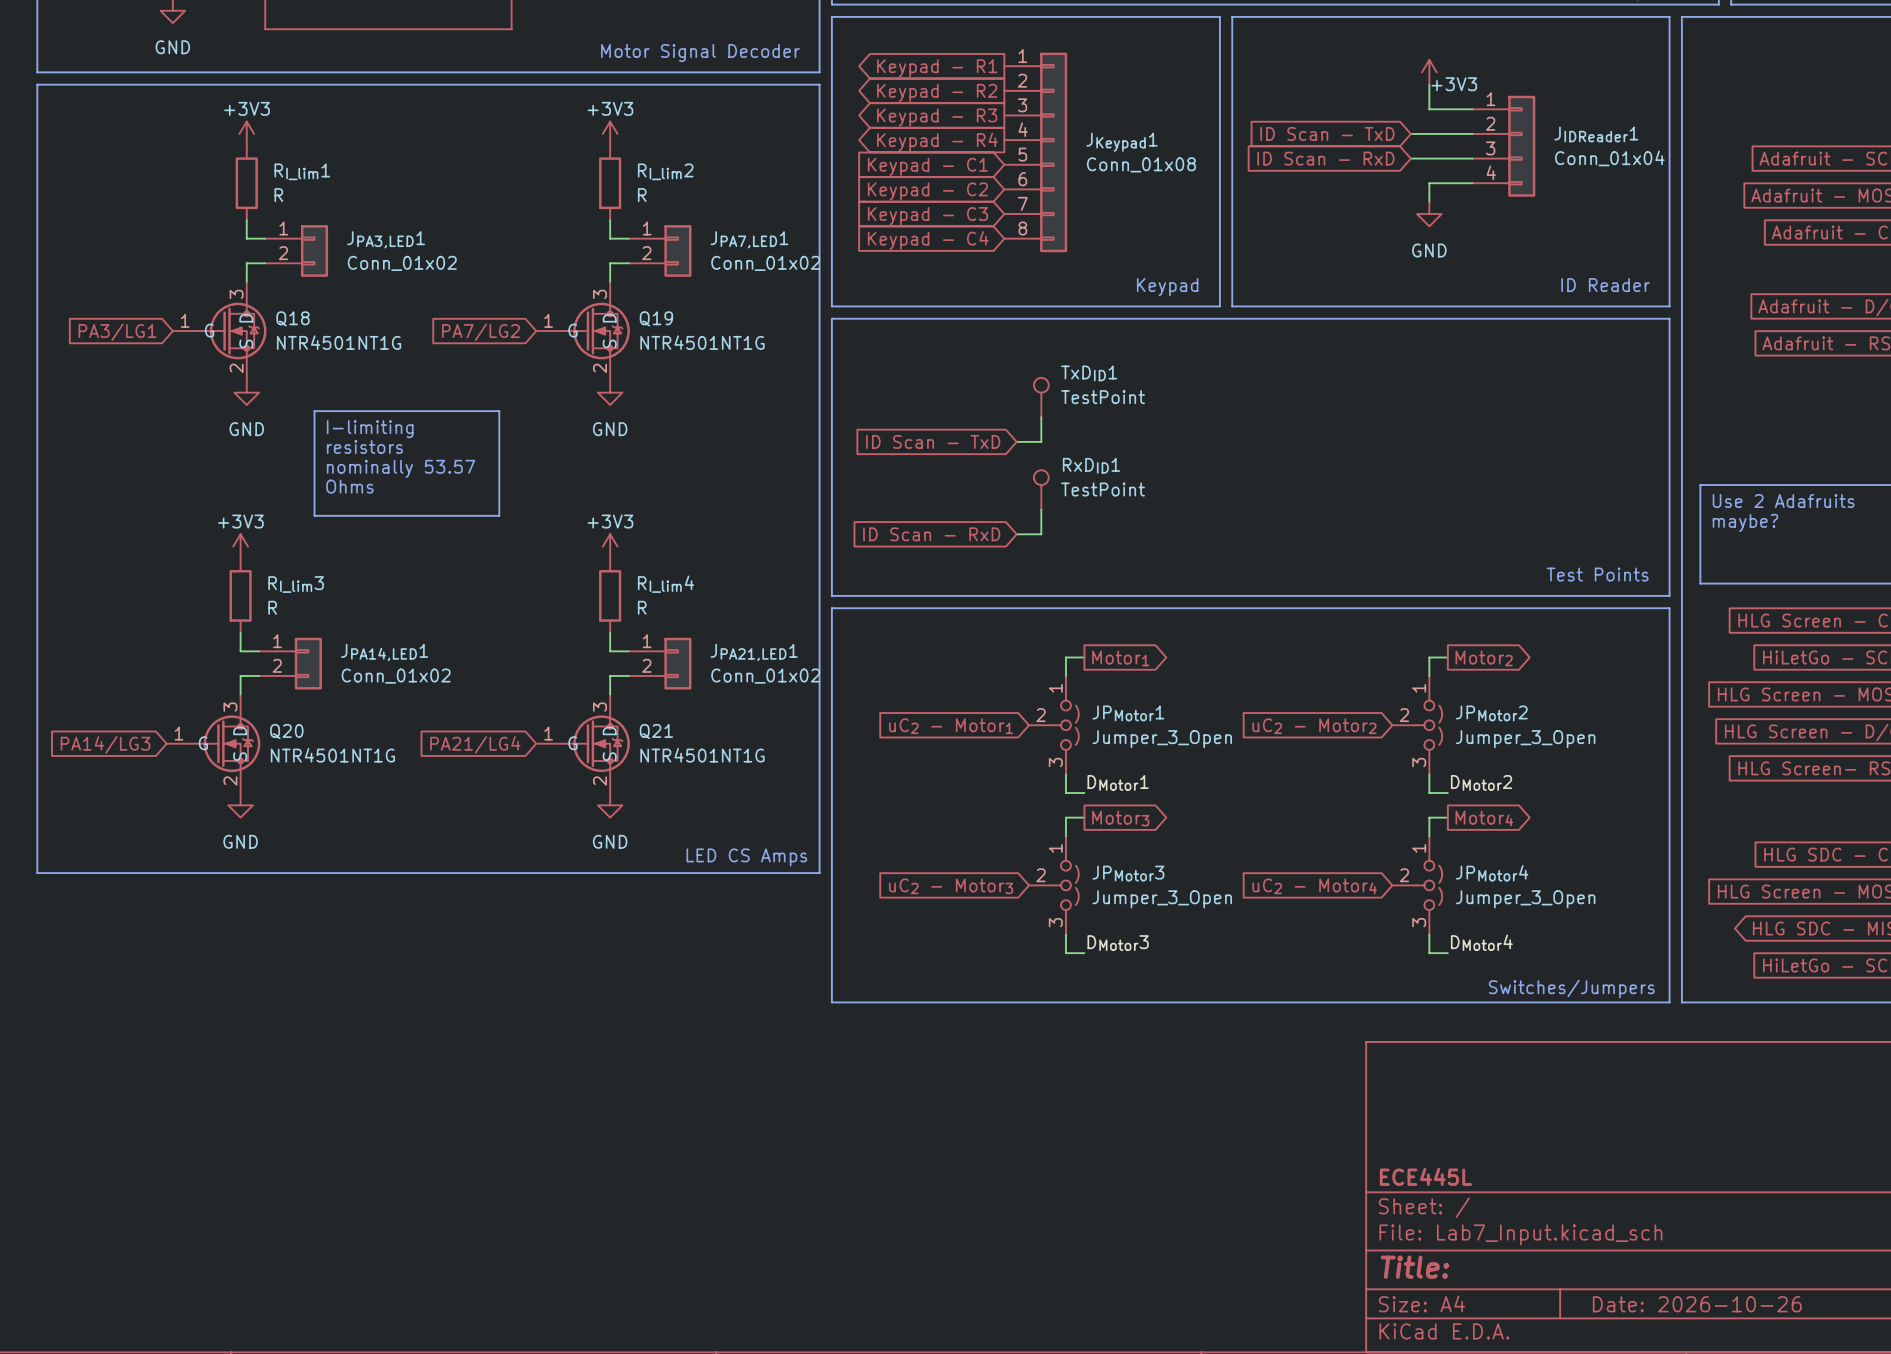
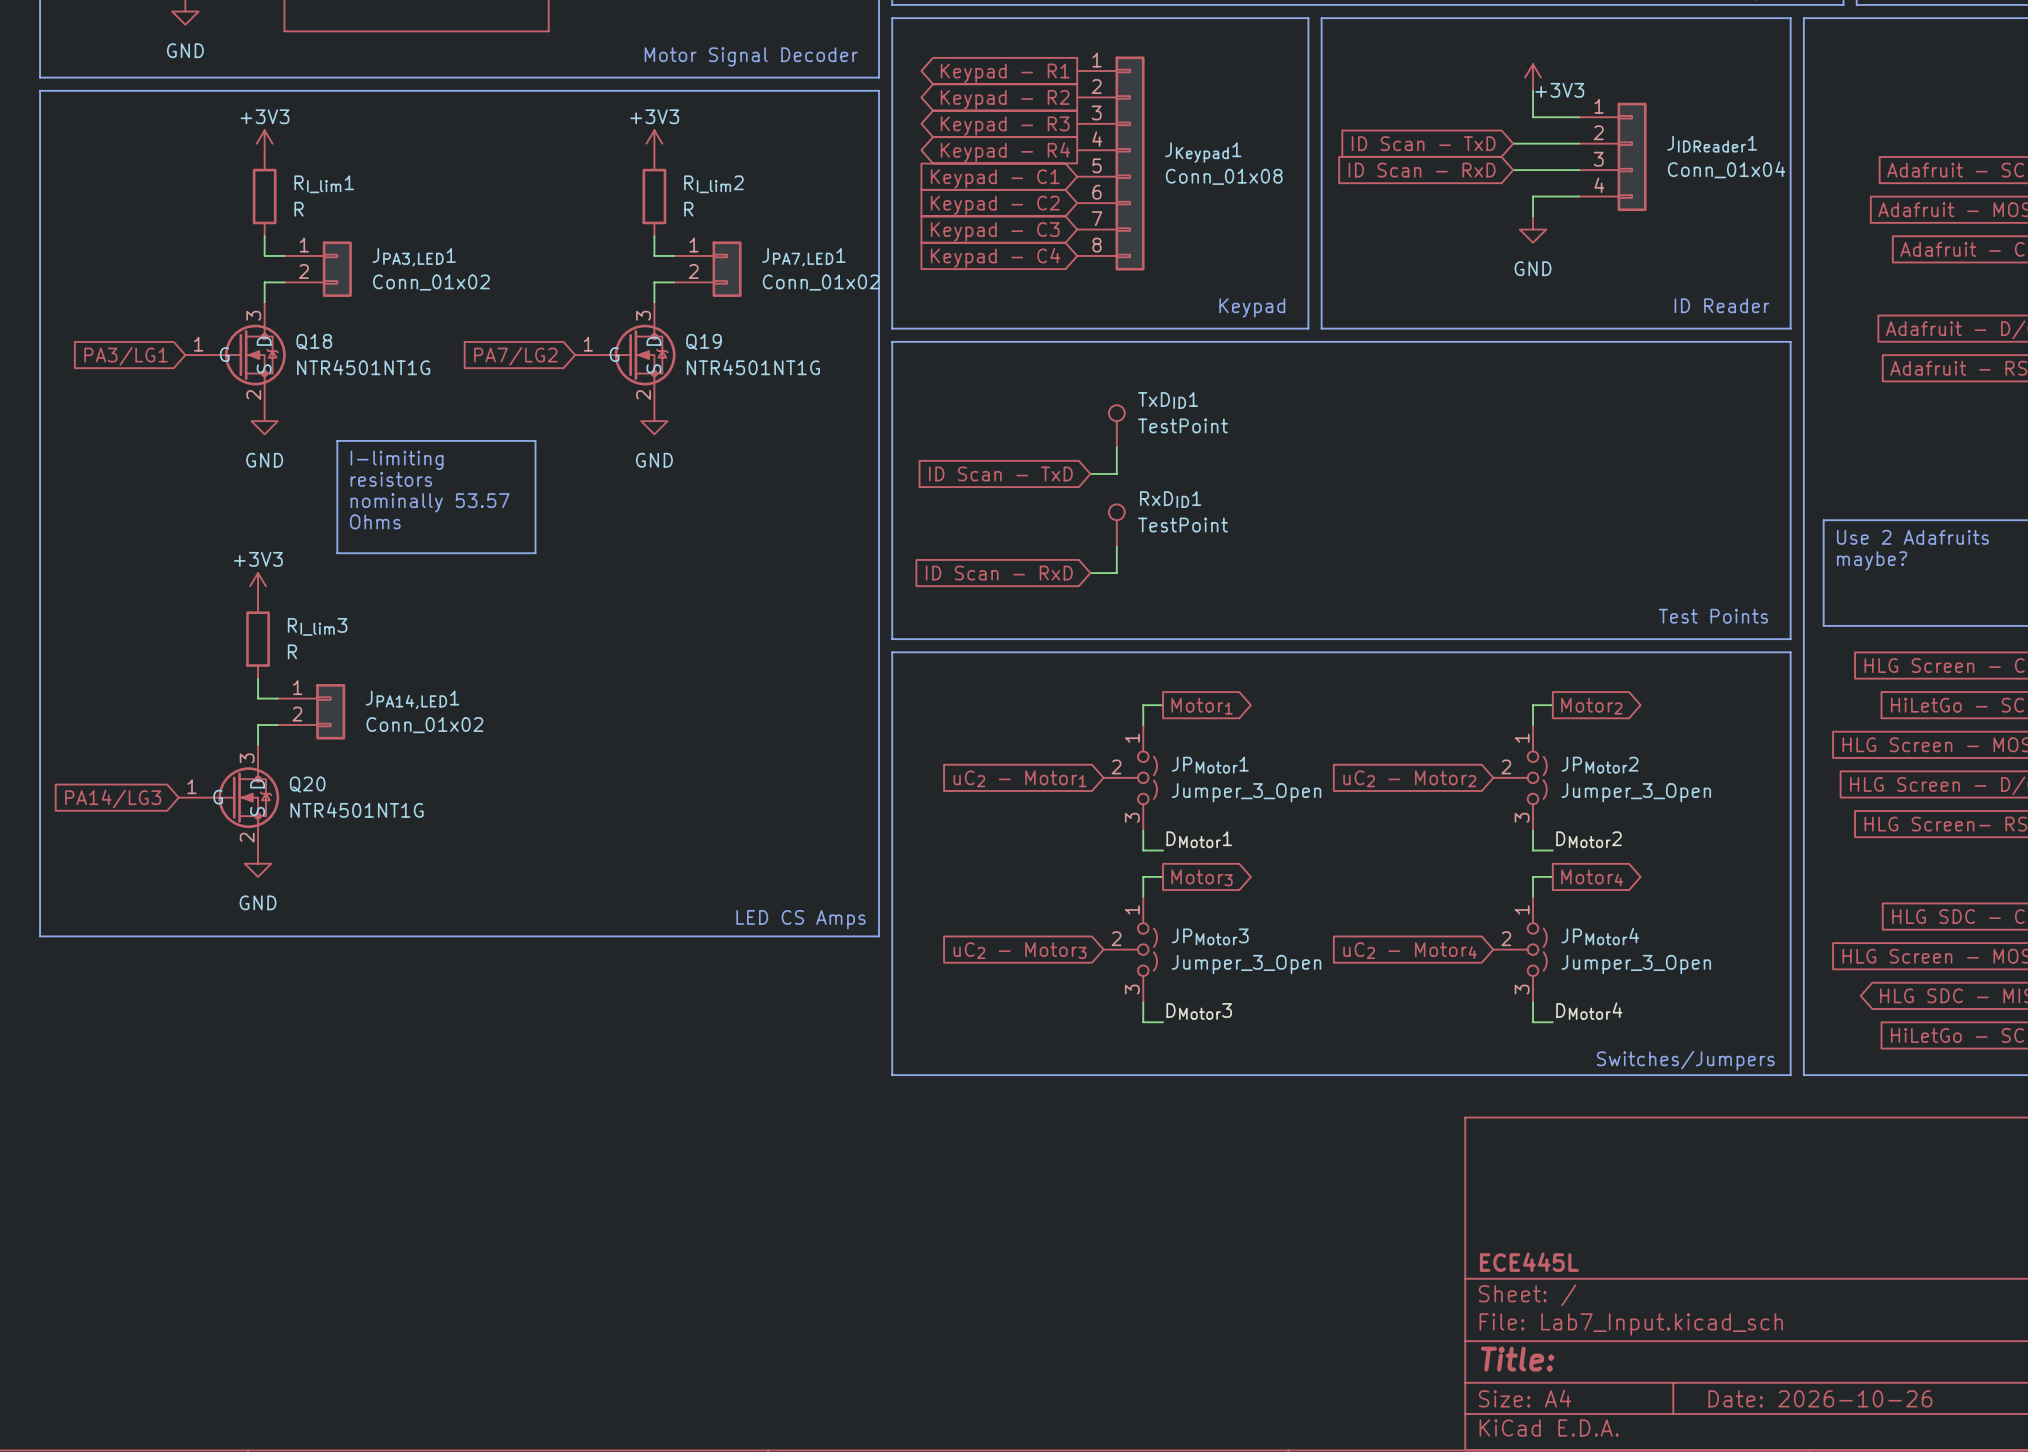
power symbol: +3V3 (610, 546) -> none
RI_lim4: R (610, 595) -> none
wire: (610, 632) (610, 651) (628, 651) -> none
JPA21,LED1: Conn_01x02 (660, 663) -> none
wire: (628, 675) (610, 675) (610, 694) -> none
Q21: NTR4501NT1G (583, 743) -> none
global label: PA21/LG4 (475, 744) -> none
power symbol: GND (610, 805) -> none

